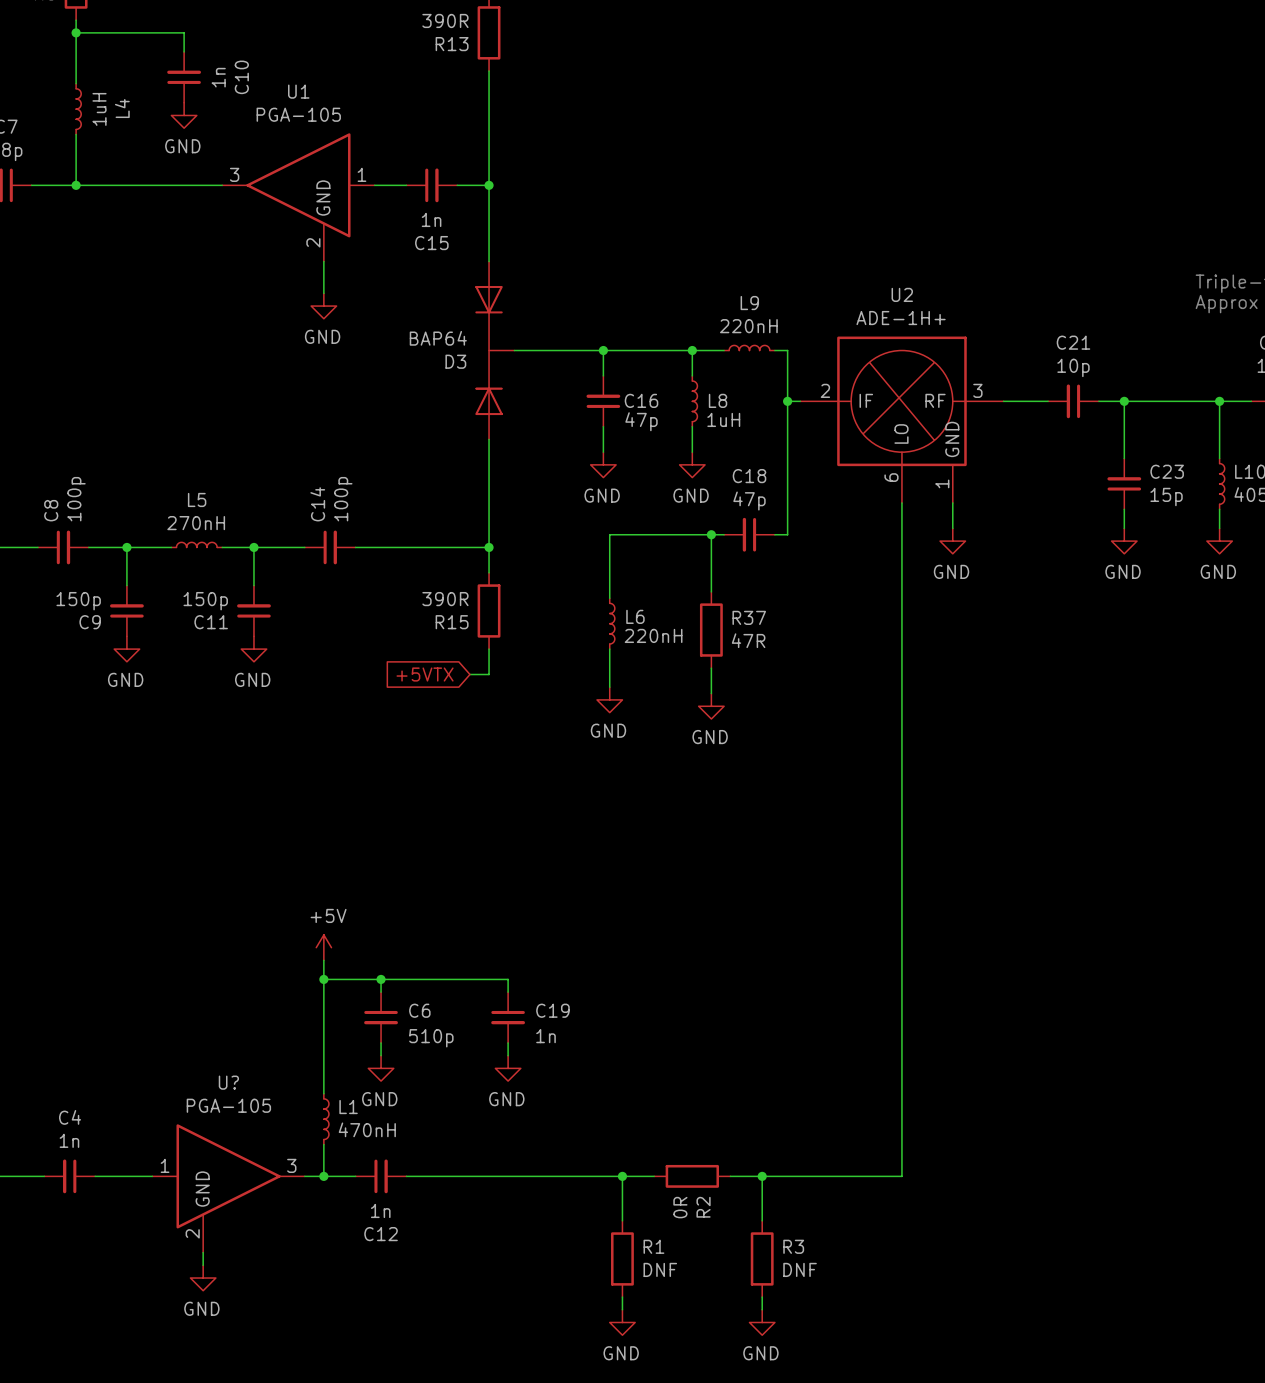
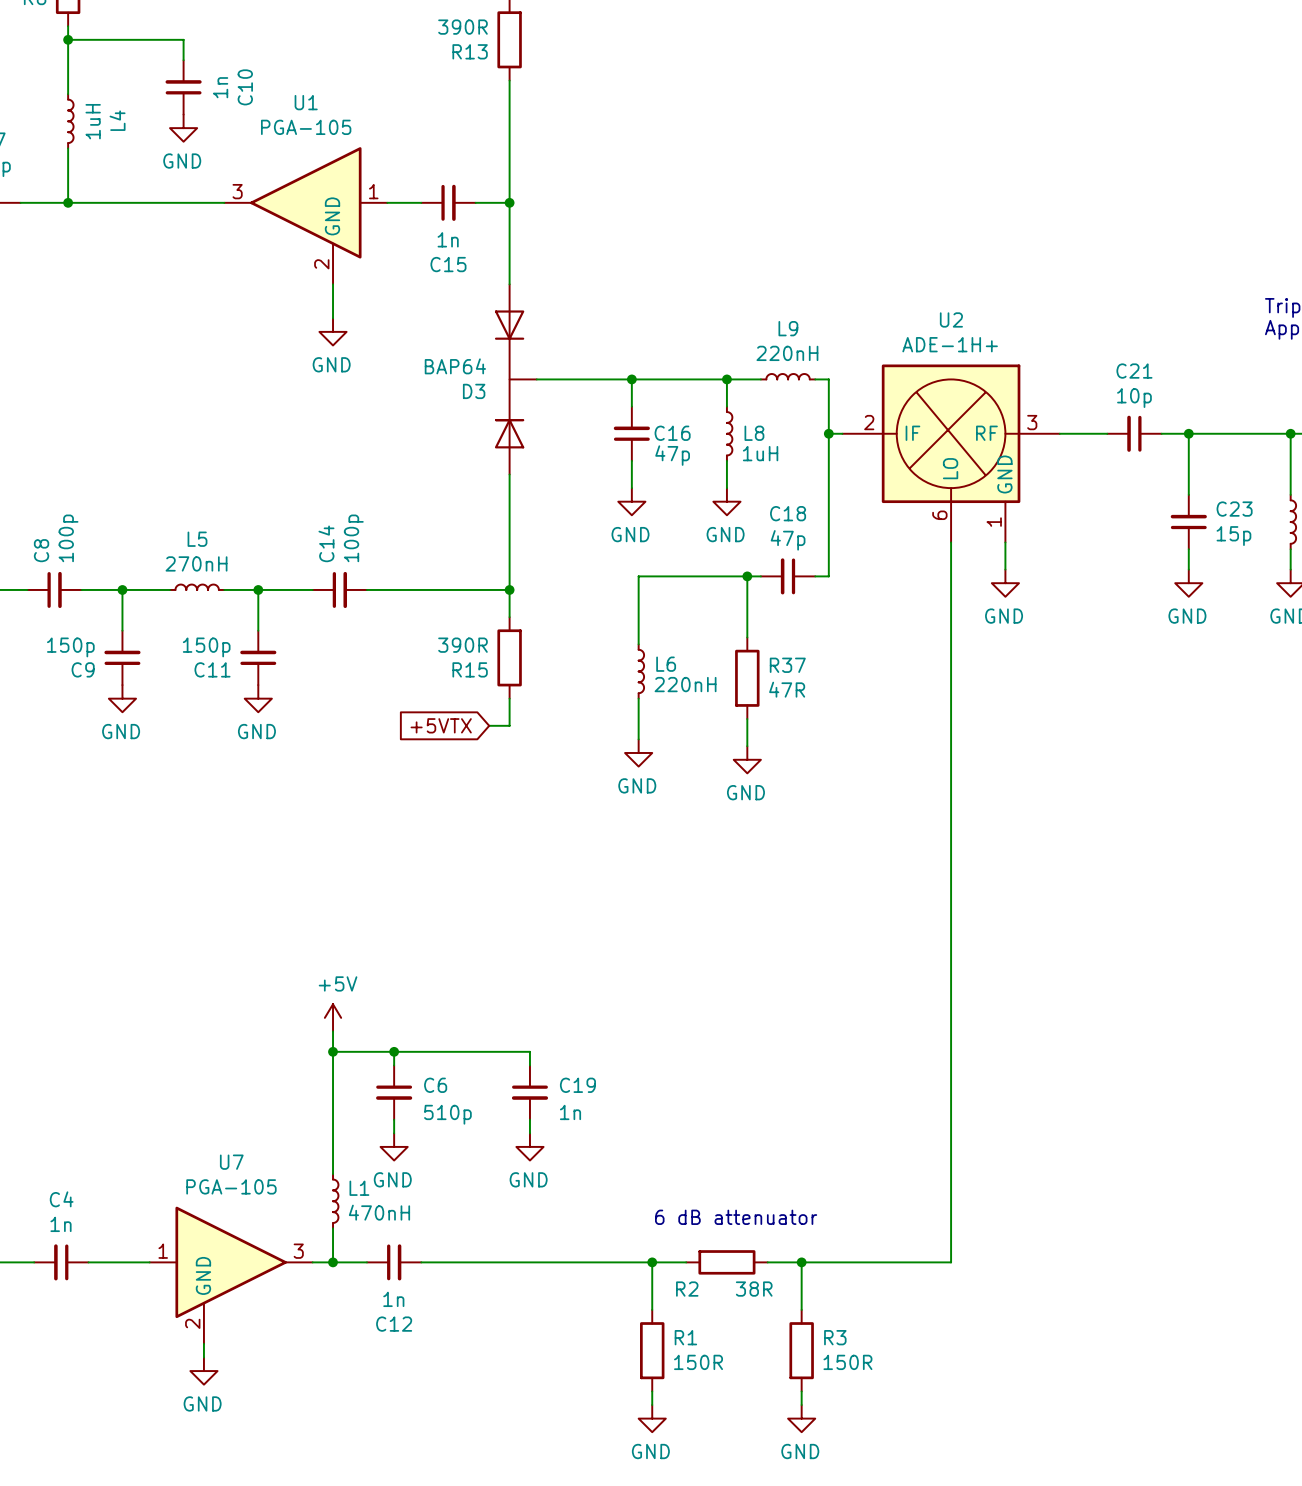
U? name: U? (228, 1082) -> U7 (231, 1162)
text: none -> 6 dB attenuator (736, 1217)
R2 value: 0R (680, 1207) -> 38R (754, 1289)
R2 name rotation: 0° (703, 1207) -> 90° clockwise (687, 1289)
R2 name position: R2 (703, 1207) -> R2 (687, 1289)
R1 value: DNF (660, 1269) -> 150R (698, 1362)
R3 value: DNF (800, 1269) -> 150R (847, 1362)

